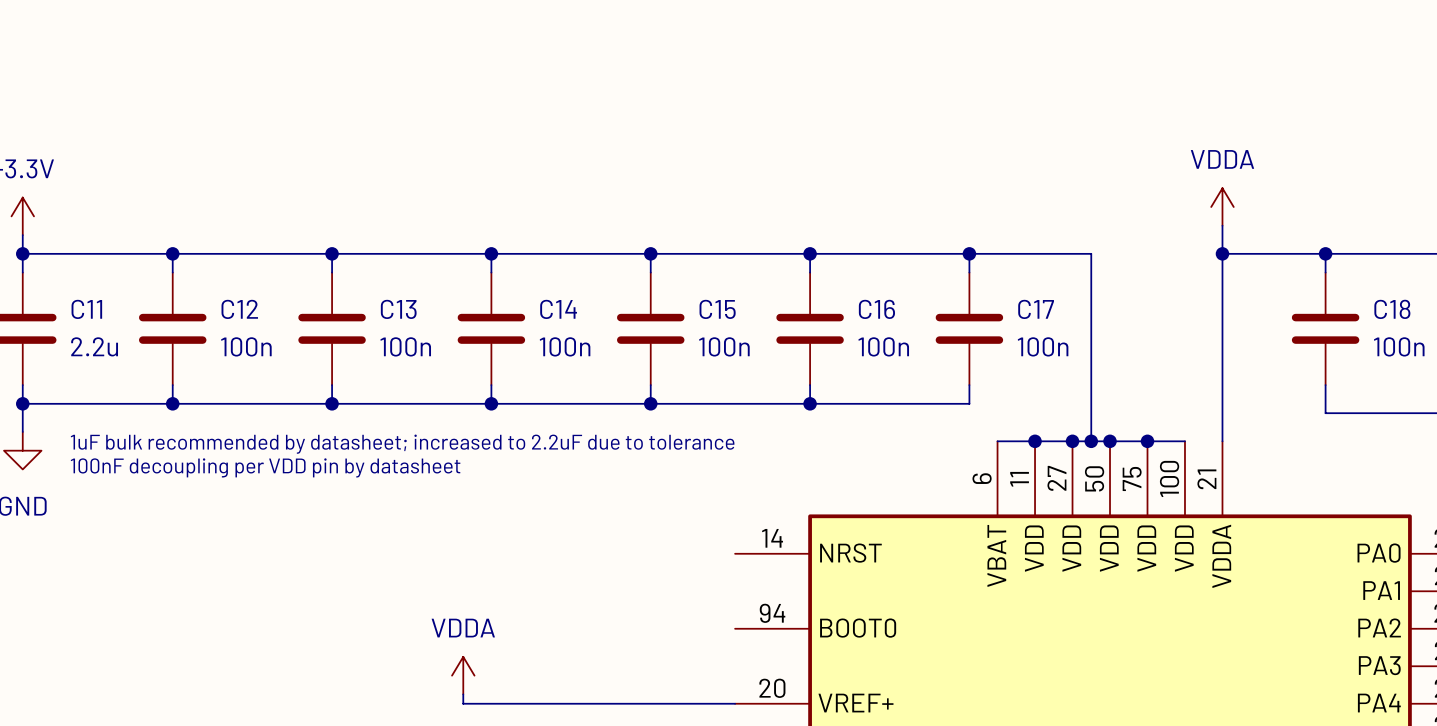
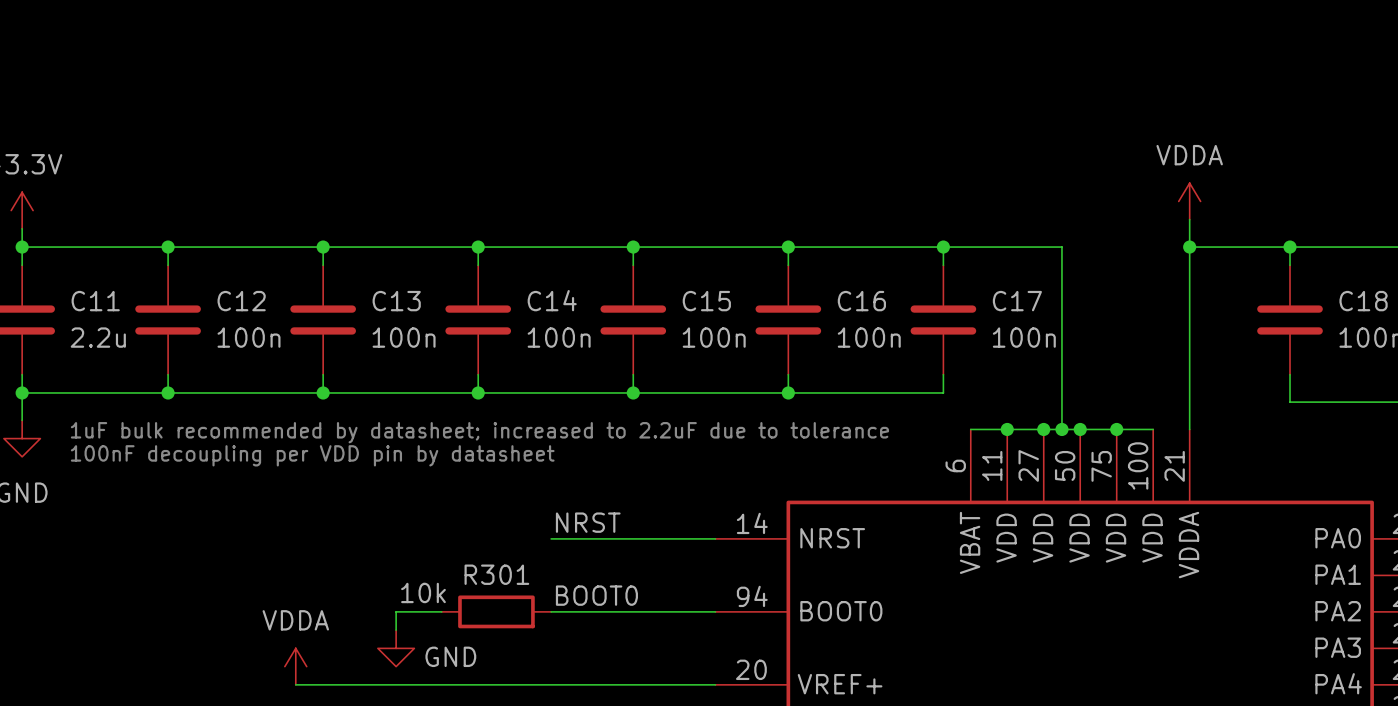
label: none -> NRST (588, 522)
wire: none -> (551, 538) (715, 538)
label: none -> BOOT0 (596, 595)
wire: none -> (441, 611) (396, 611) (396, 630)
R301: none -> 10k (496, 611)
wire: none -> (551, 611) (715, 611)
power symbol: none -> GND (396, 648)
power symbol position: VDDA (463, 675) -> VDDA (295, 666)
wire: (463, 694) (463, 703) -> (295, 684) (450, 684)

